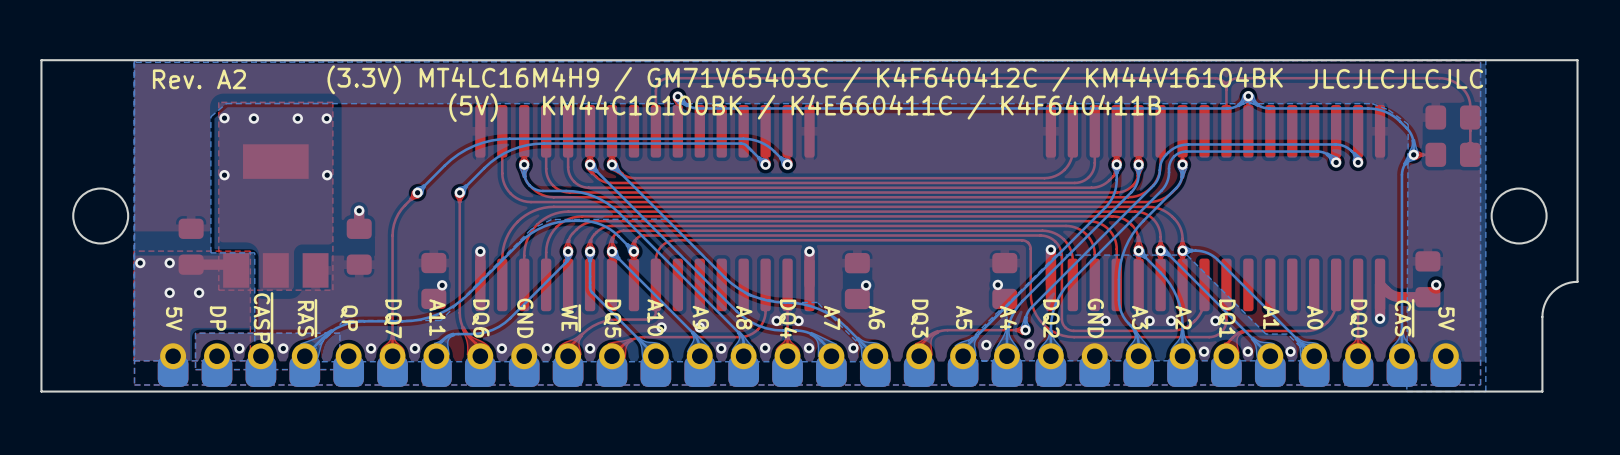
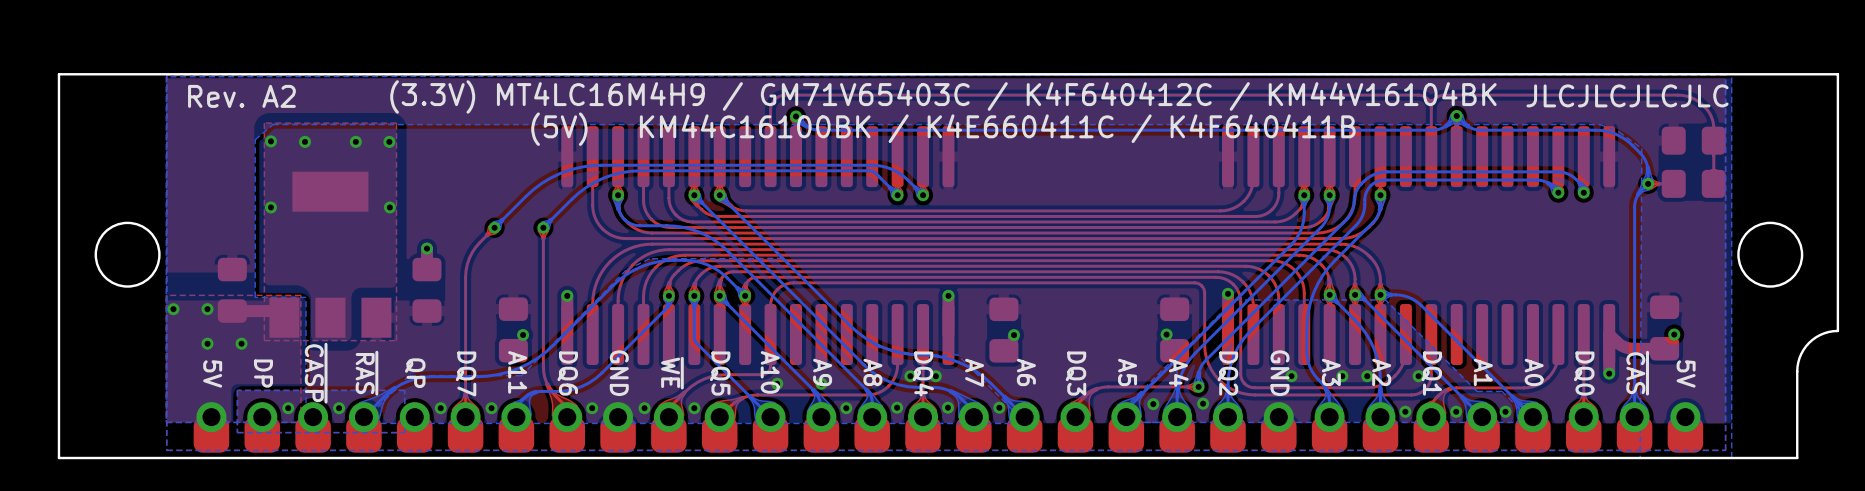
part footprint: [40, 59, 1579, 393] -> [57, 73, 1840, 460]

